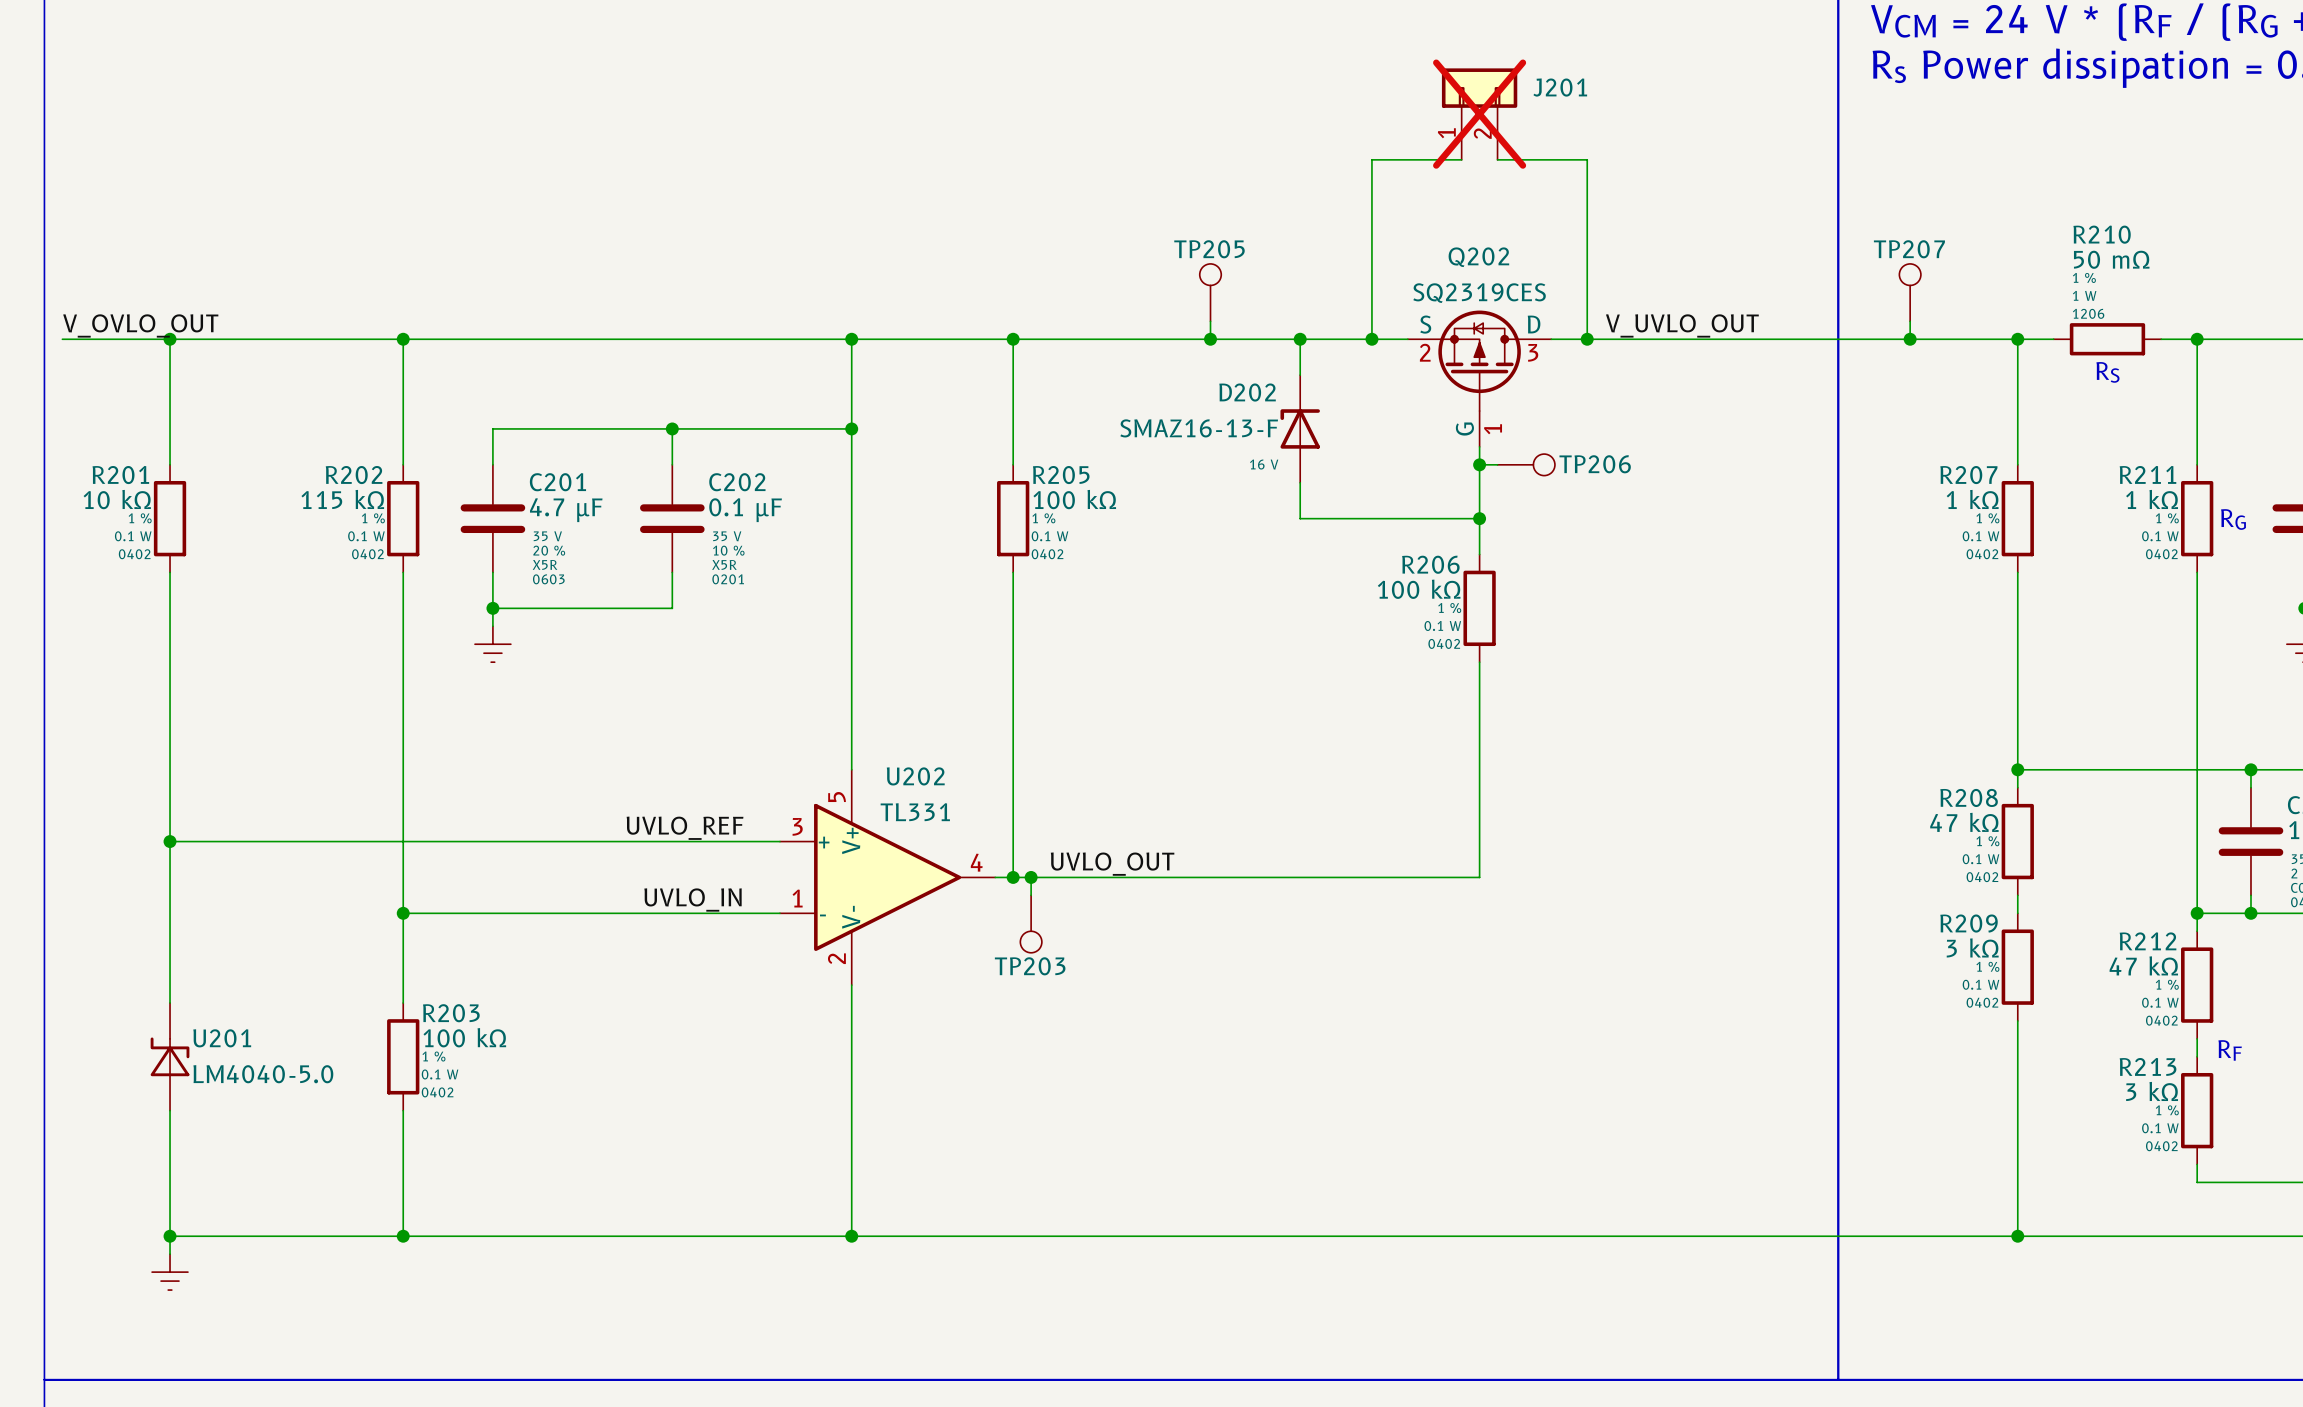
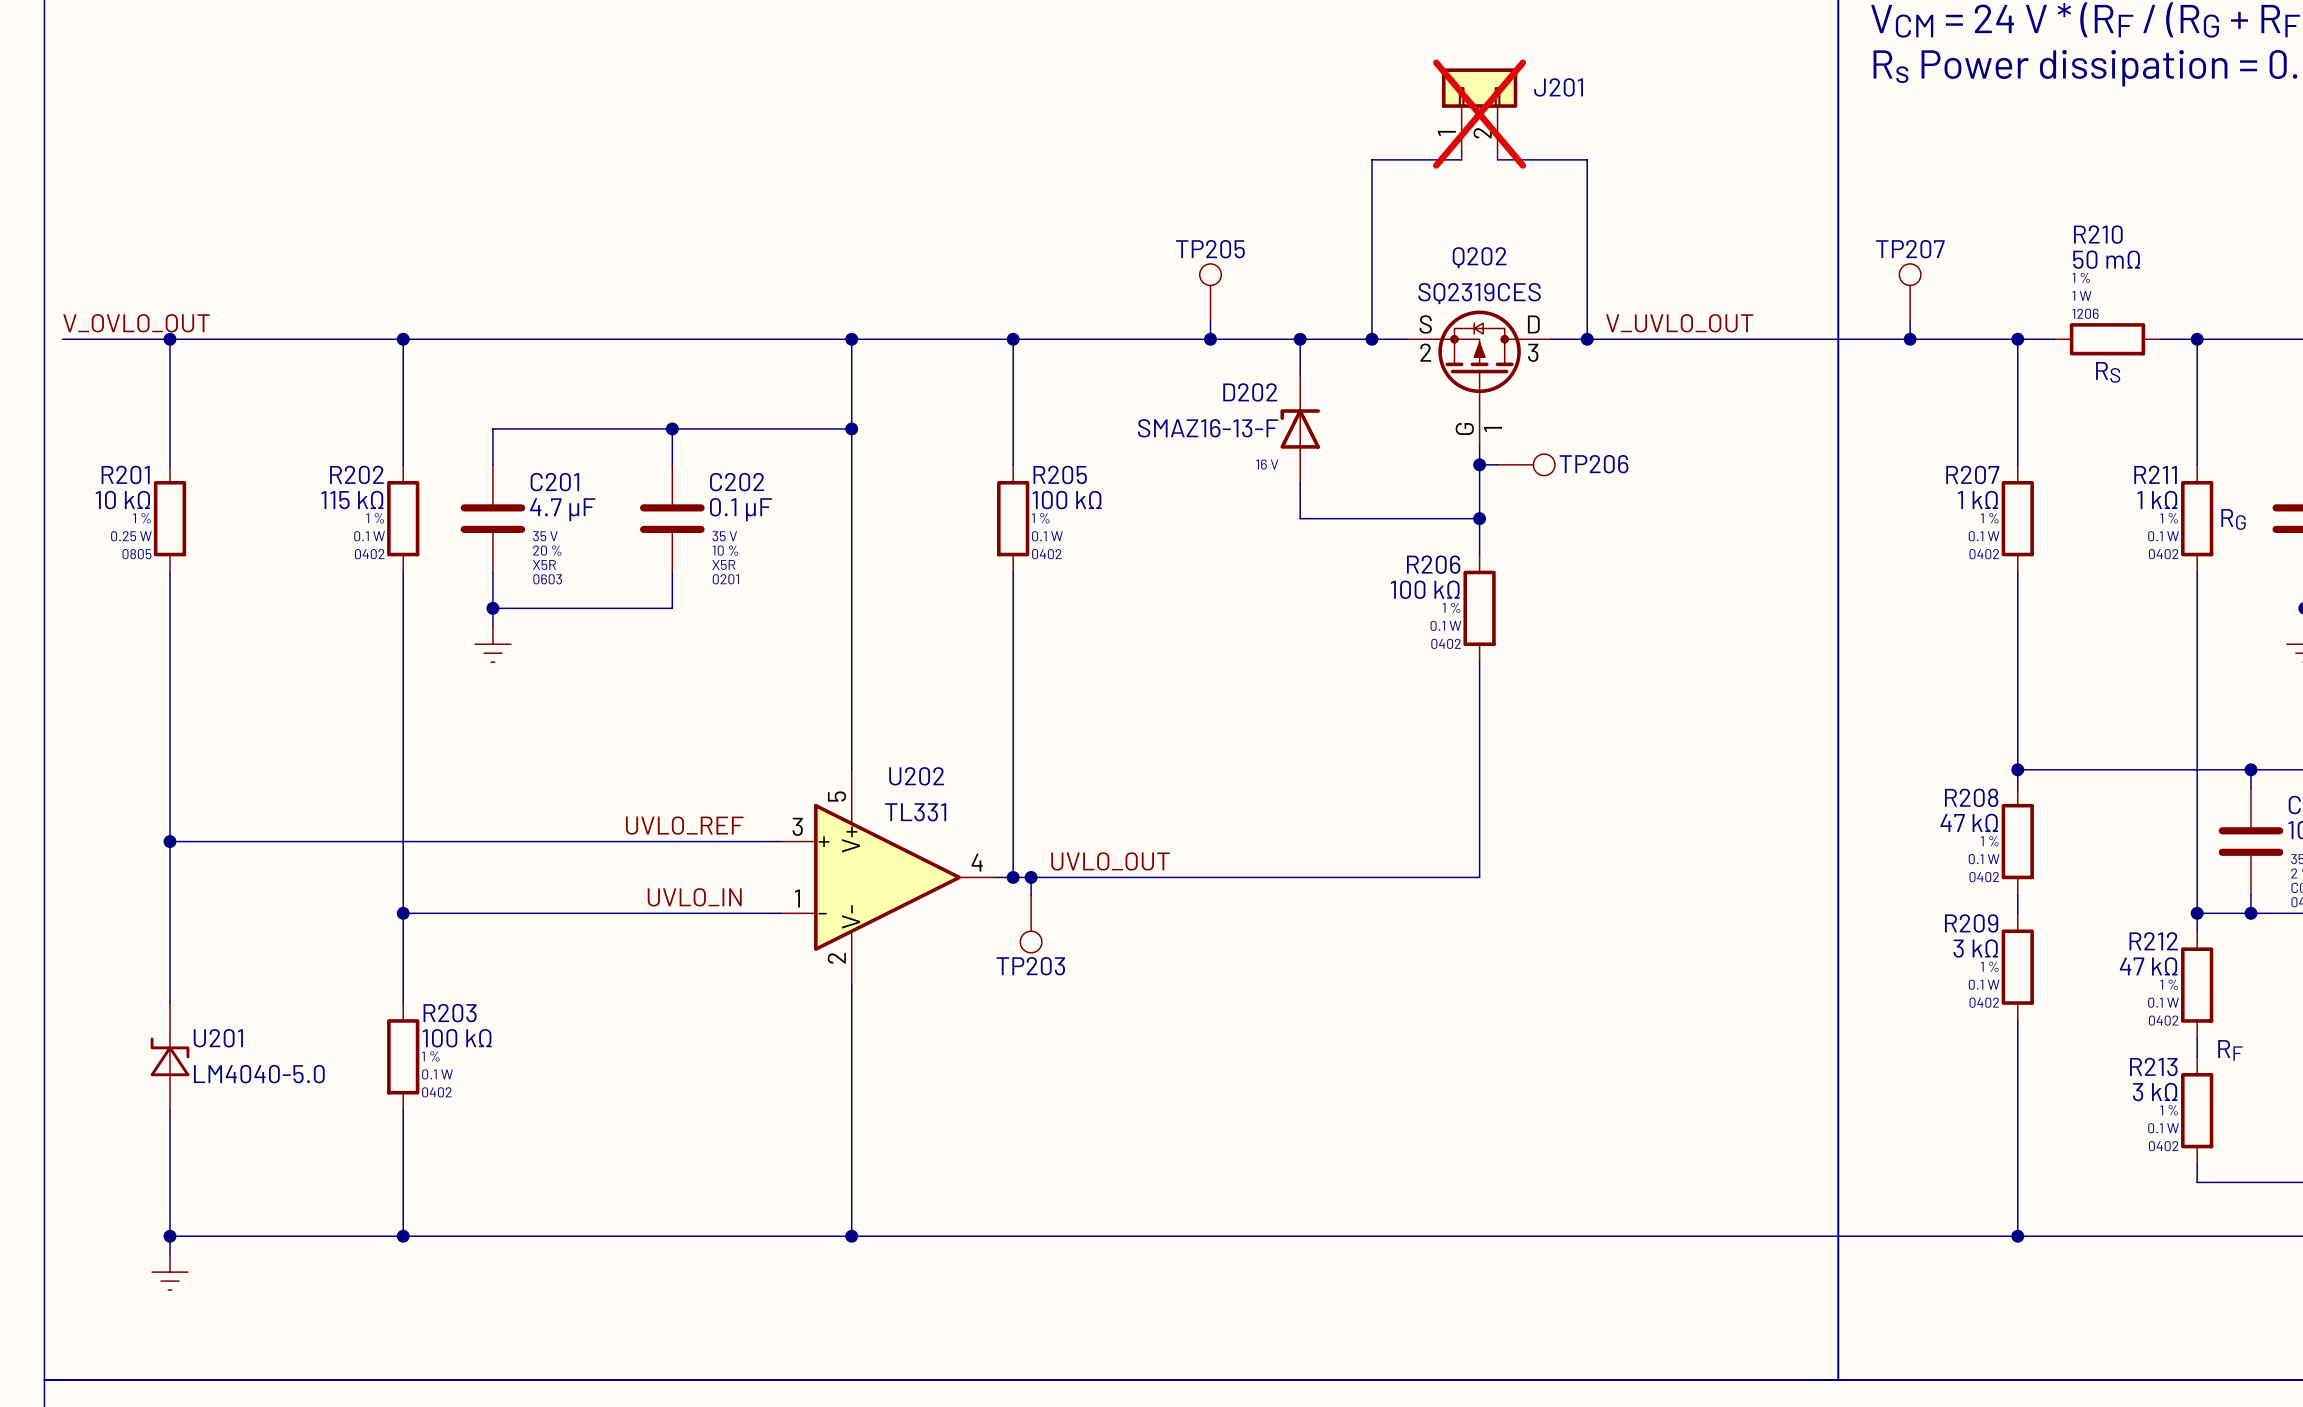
R201 text: 0.1 W (133, 536) -> 0.25 W (131, 536)
R201 text: 0402 (134, 554) -> 0805 (136, 554)

